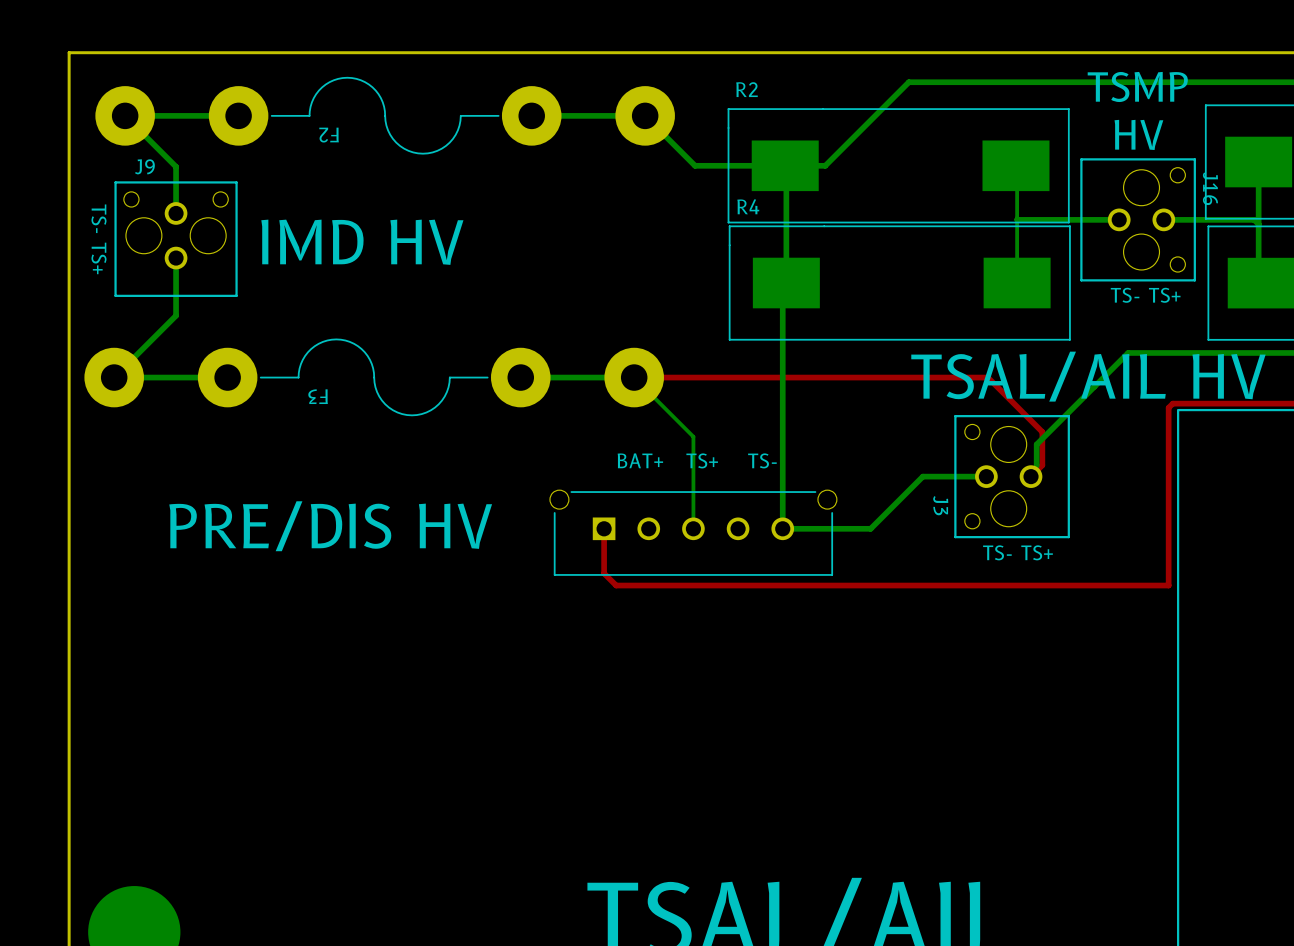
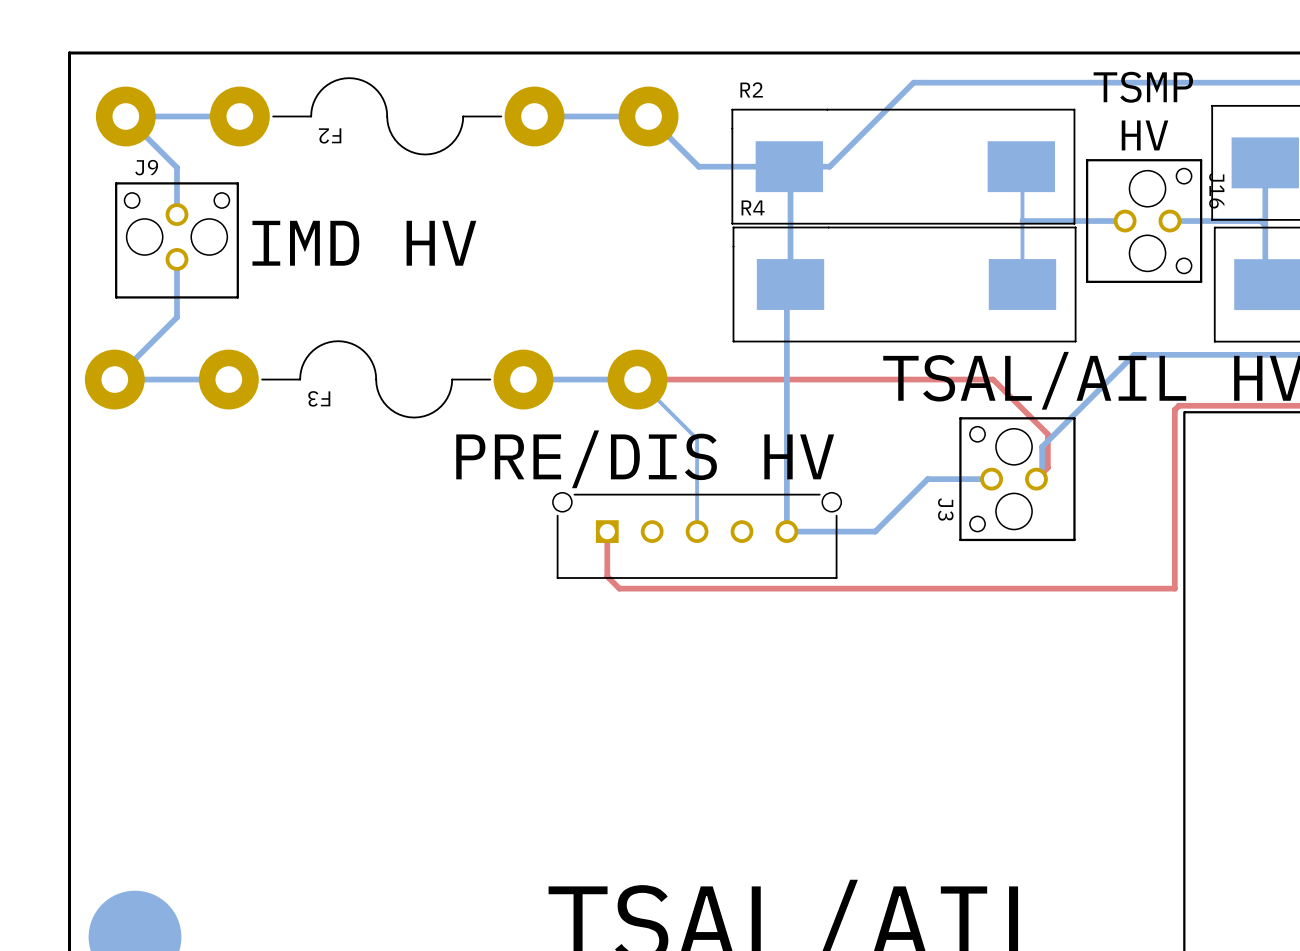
text: TS- TS+ (99, 239) -> none
text: TS- TS+ (1145, 295) -> none
text: BAT+ TS+ TS- (697, 460) -> none
text position: PRE/DIS HV (330, 526) -> PRE/DIS HV (645, 459)
text: TS- TS+ (1017, 552) -> none

